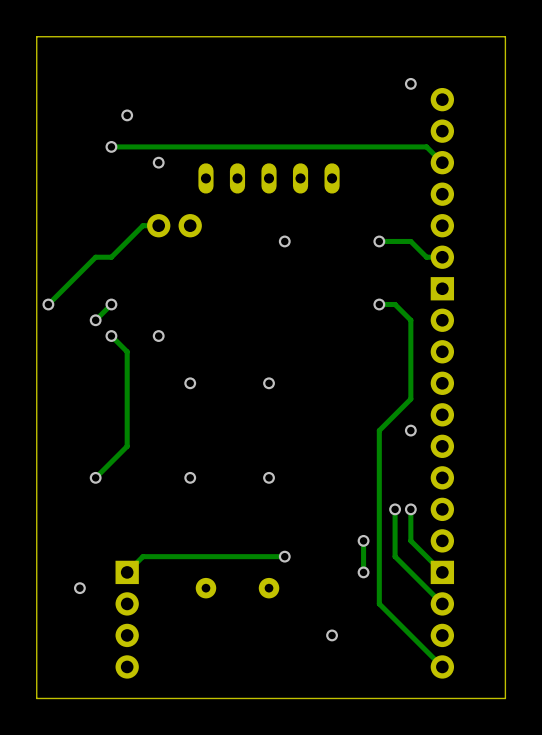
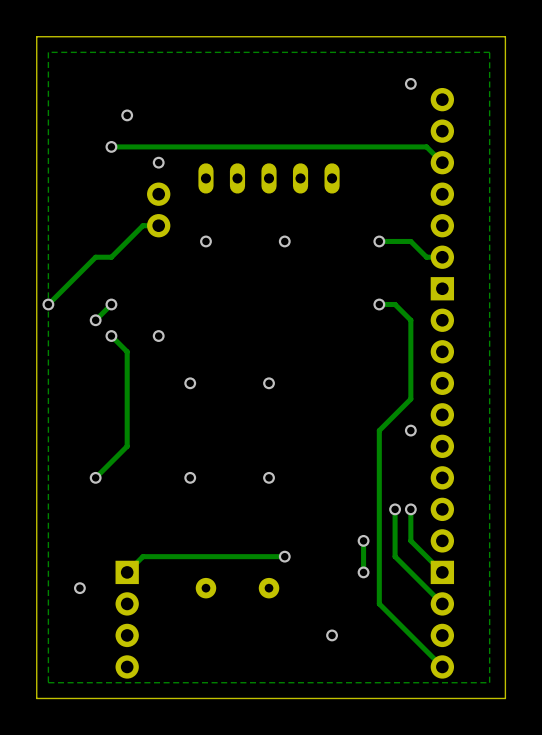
zone outline: none -> (489, 52) (48, 52) (48, 682) (489, 682) (489, 52)
part rotation: 0° (174, 225) -> 90° clockwise (158, 209)
via: none -> (205, 241)

